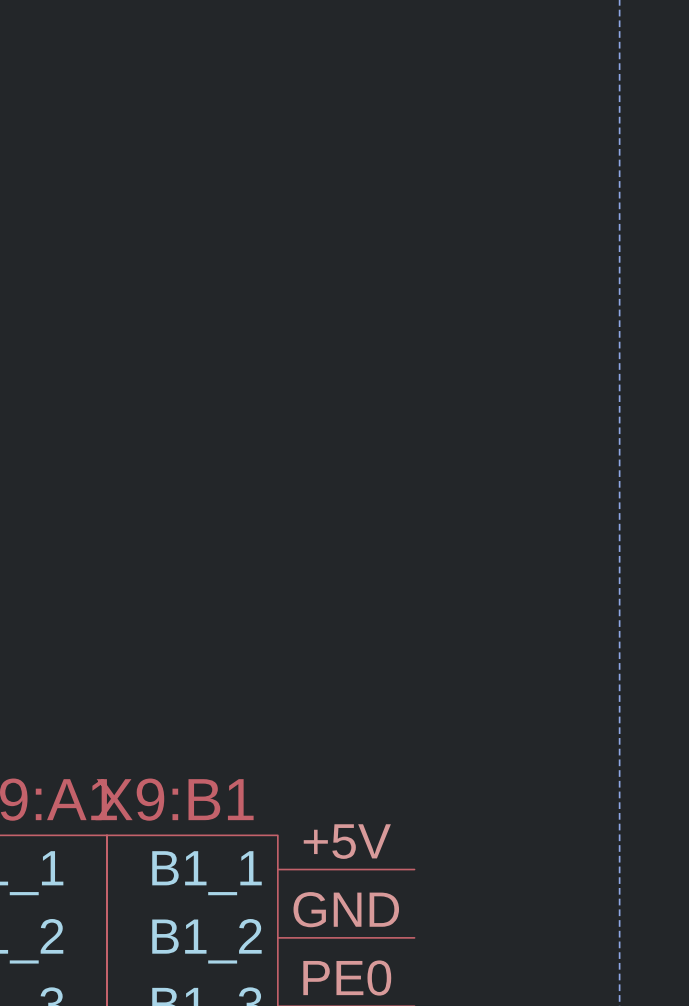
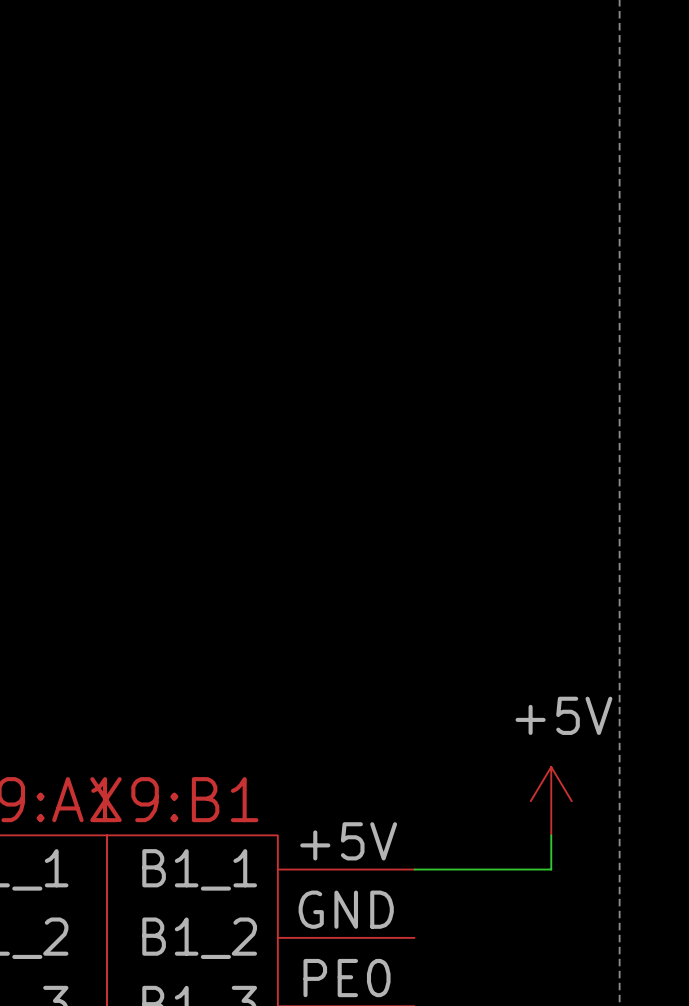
power symbol: none -> +5V (551, 801)
wire: none -> (551, 835) (551, 869) (414, 869)

